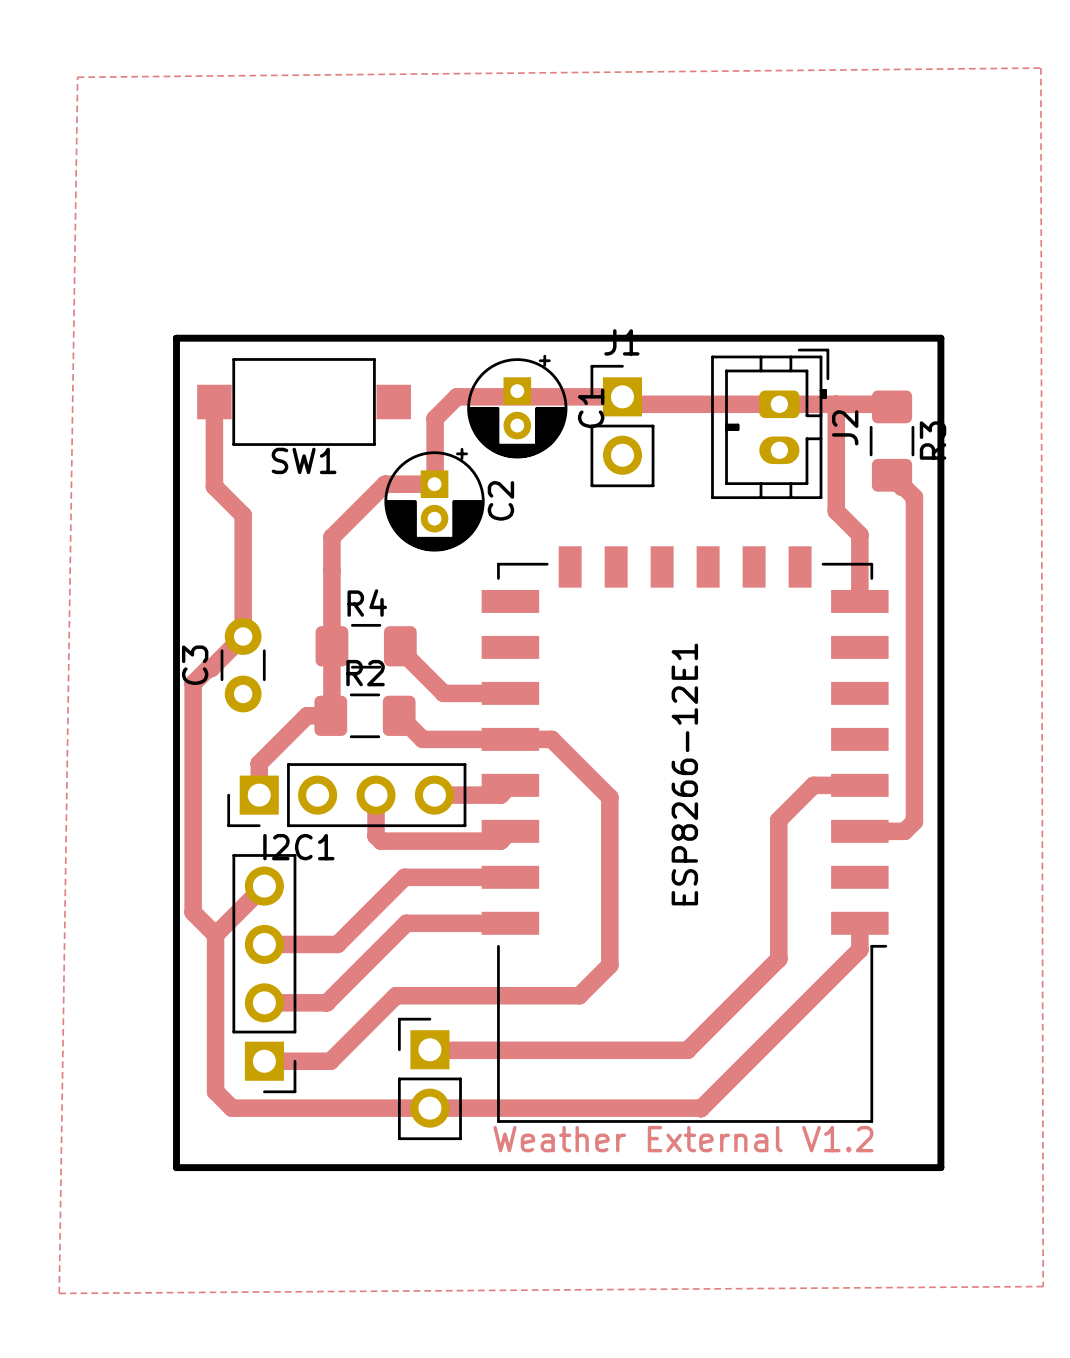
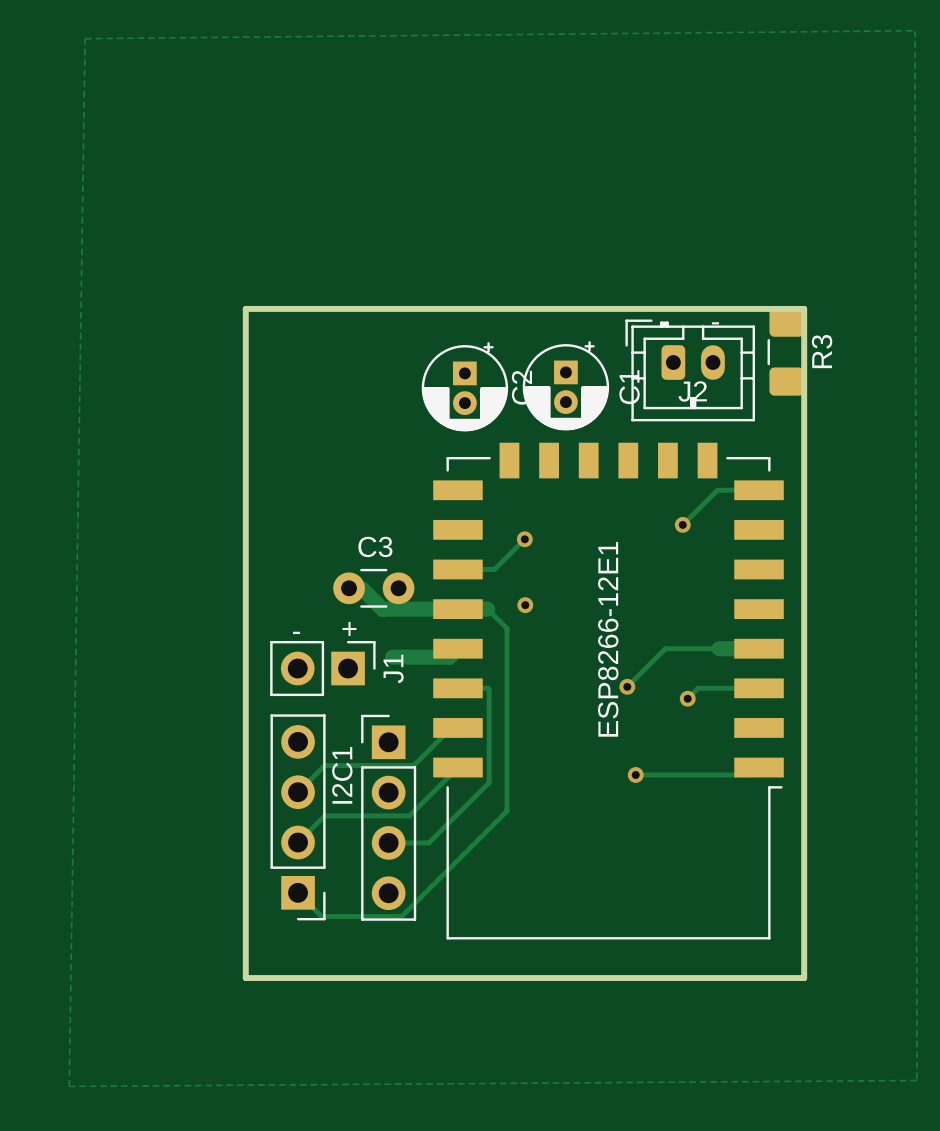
board edge: (176, 338) (940, 338) (940, 1167) (912, 1167) -> (245, 978) (245, 308) (804, 308) (804, 978)
board edge: (176, 338) (176, 1167) (264, 1167) -> none
track: (214, 402) (214, 486) (243, 515) (243, 636) (193, 683) (193, 912) (215, 934) -> none
SW1: (304, 402) -> none
track: (836, 404) (836, 511) (859, 534) (859, 601) -> (682, 524) (717, 490) (759, 490)
C1 position: (517, 406) -> (565, 385)
track: (892, 406) (889, 404) (629, 404) (622, 396) (456, 396) (435, 418) (435, 483) (385, 484) (331, 537) (331, 714) (306, 715) (259, 763) (259, 795) -> none
text: none -> - (715, 323)
J2 rotation: 0° (770, 423) -> 90° counterclockwise (690, 370)
J1 rotation: 0° (622, 426) -> 90° clockwise (322, 668)
J1 position: (622, 426) -> (322, 668)
J2 name position: J2 (845, 427) -> J2 (692, 391)
track: (892, 475) (901, 487) (914, 497) (914, 821) (904, 831) (859, 831) (861, 832) -> none
C2 position: (434, 499) -> (464, 386)
via: none -> (682, 524)
R4: (366, 646) -> none
track: (400, 646) (400, 650) (443, 693) (510, 693) -> (524, 539) (494, 569) (457, 569)
via: none -> (524, 539)
C3 rotation: 0° (243, 665) -> 90° clockwise (373, 588)
C3 position: (243, 665) -> (373, 588)
R2: (364, 715) -> none
via: none -> (525, 605)
track: (544, 739) (551, 739) (609, 797) (609, 965) (579, 995) (396, 995) (330, 1061) (264, 1061) -> (487, 609) (506, 628) (506, 811) (401, 916) (321, 916) (298, 892)
text: none -> + (349, 628)
text: none -> - (296, 632)
track: (813, 785) (778, 820) (778, 958) (687, 1050) (429, 1049) -> (719, 648) (665, 648) (627, 686)
I2C1 rotation: 0° (346, 795) -> 90° clockwise (388, 817)
I2C1 position: (346, 795) -> (388, 817)
track: (376, 795) (376, 836) (381, 841) (500, 841) (510, 831) -> (388, 842) (428, 842) (489, 782) (489, 689) (457, 688)
via: none -> (627, 686)
track: none -> (759, 688) (698, 688) (687, 698)
via: none -> (687, 698)
track: (502, 877) (404, 877) (337, 944) (264, 944) -> (451, 727) (413, 765) (324, 765) (298, 792)
track: (264, 886) (215, 934) -> none
track: (510, 923) (406, 923) (326, 1002) (264, 1002) -> (457, 767) (409, 815) (324, 815) (298, 842)
track: (859, 923) (859, 949) (700, 1108) (232, 1108) (215, 1091) (215, 934) -> (759, 767) (751, 774) (635, 774)
via: none -> (635, 774)
part position: (264, 973) -> (298, 817)
part: (429, 1078) -> none
text: Weather External V1.2 (683, 1139) -> none

